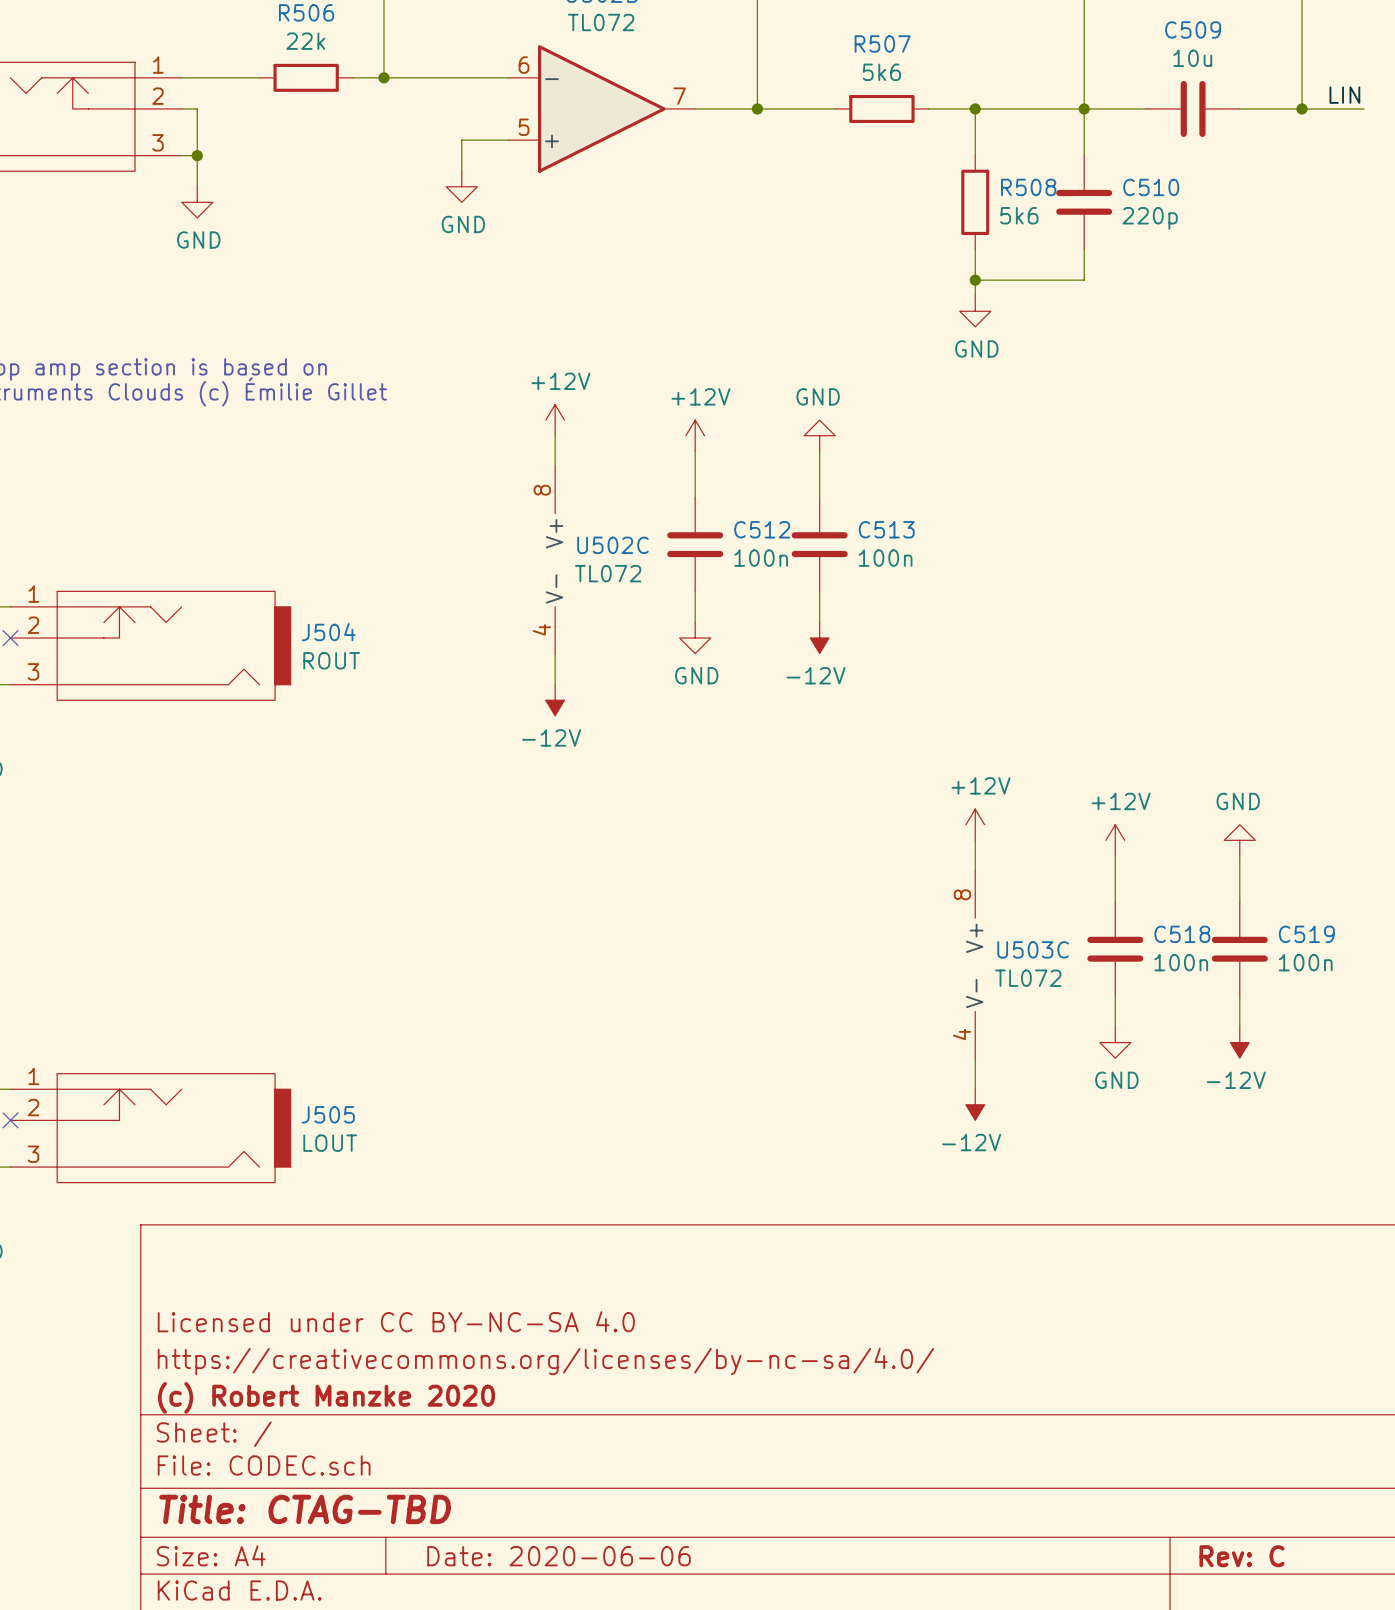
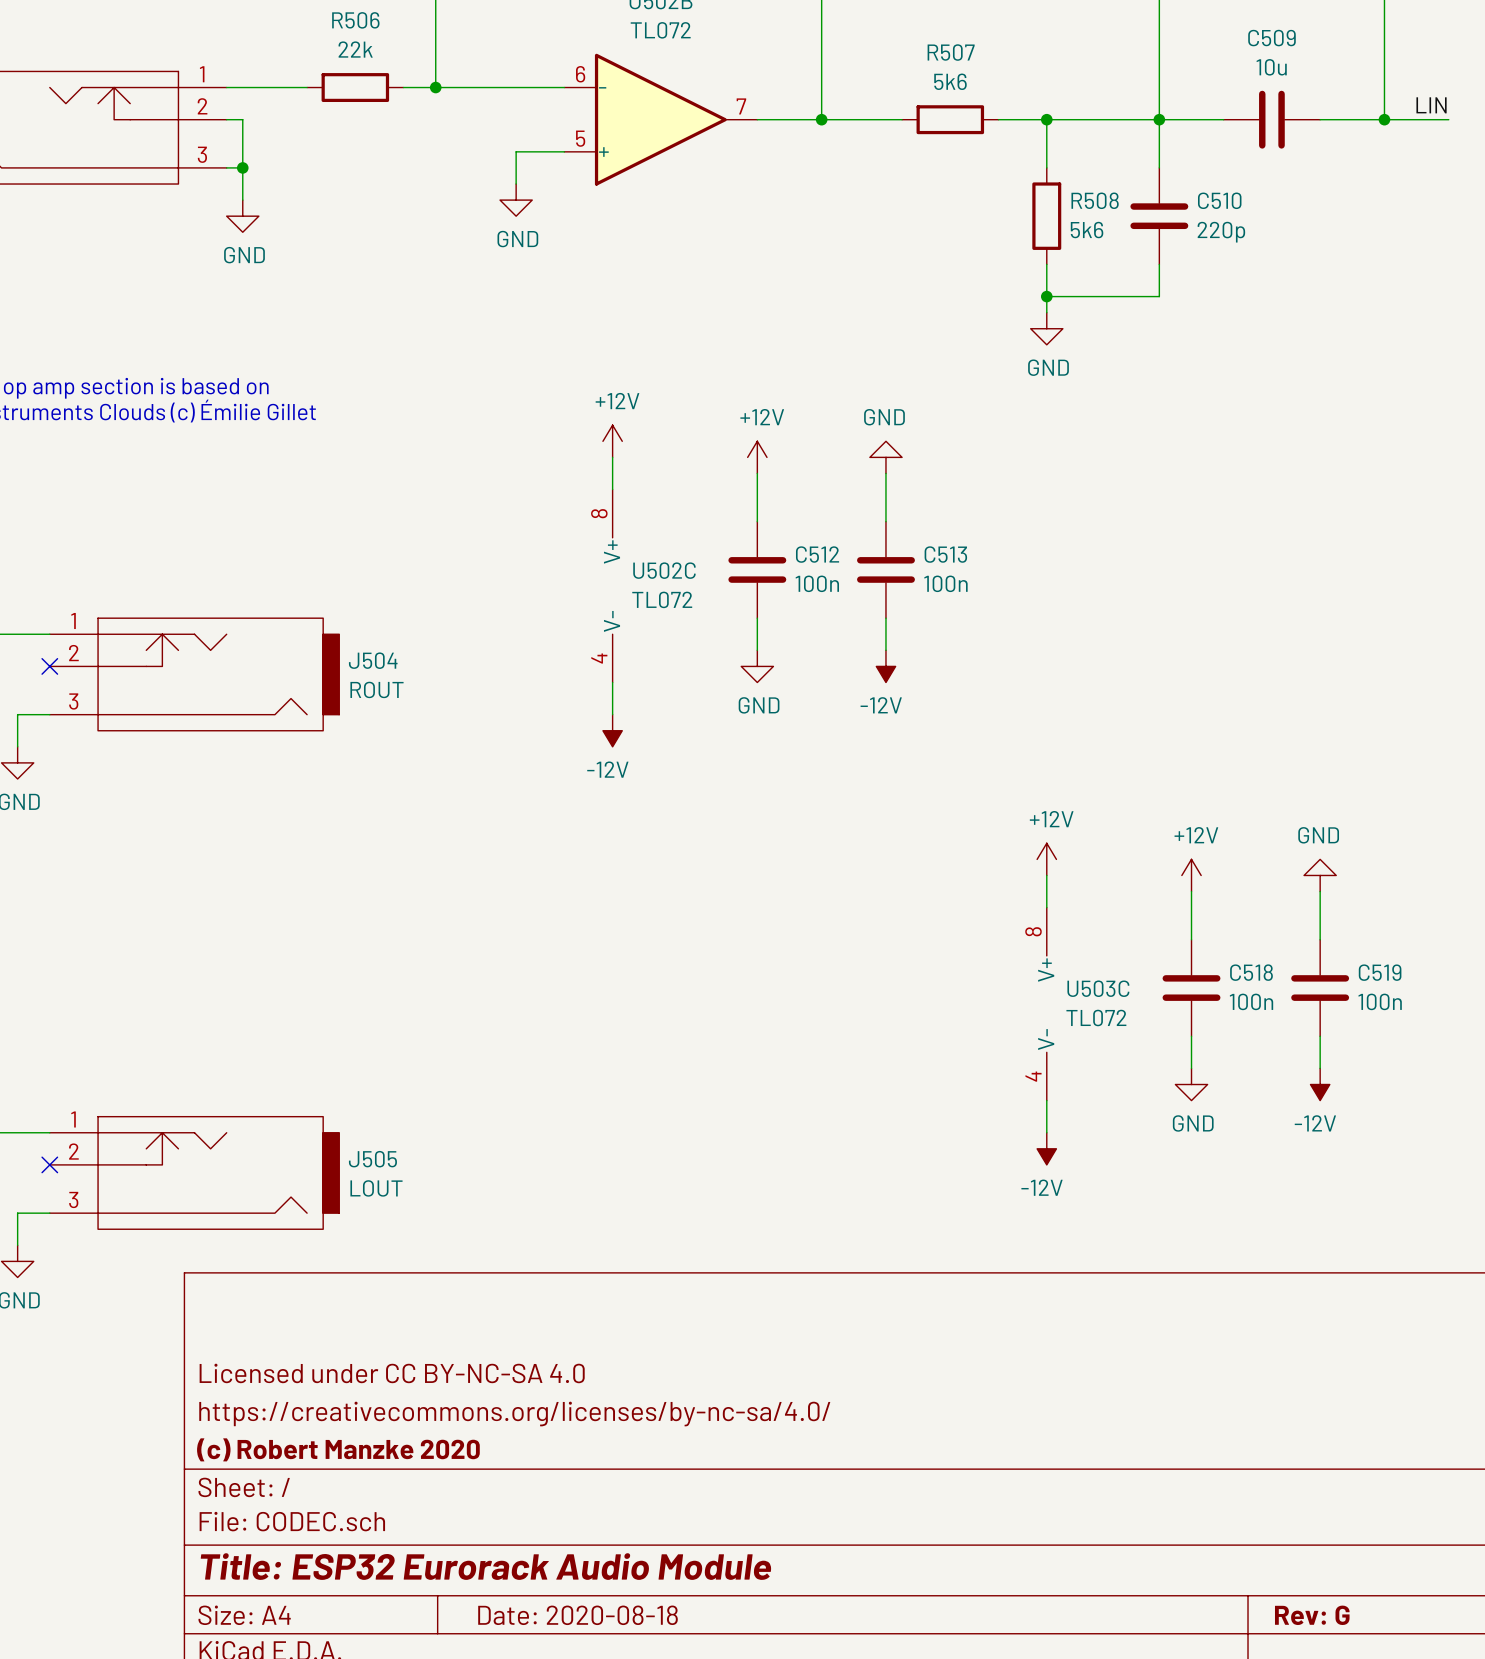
title block: Title: CTAG-TBD (305, 1509) -> Title: ESP32 Eurorack Audio Module (485, 1566)
title block: Date: 2020-06-06 (559, 1556) -> Date: 2020-08-18 (578, 1615)
title block: Rev: C (1241, 1556) -> Rev: G (1312, 1615)

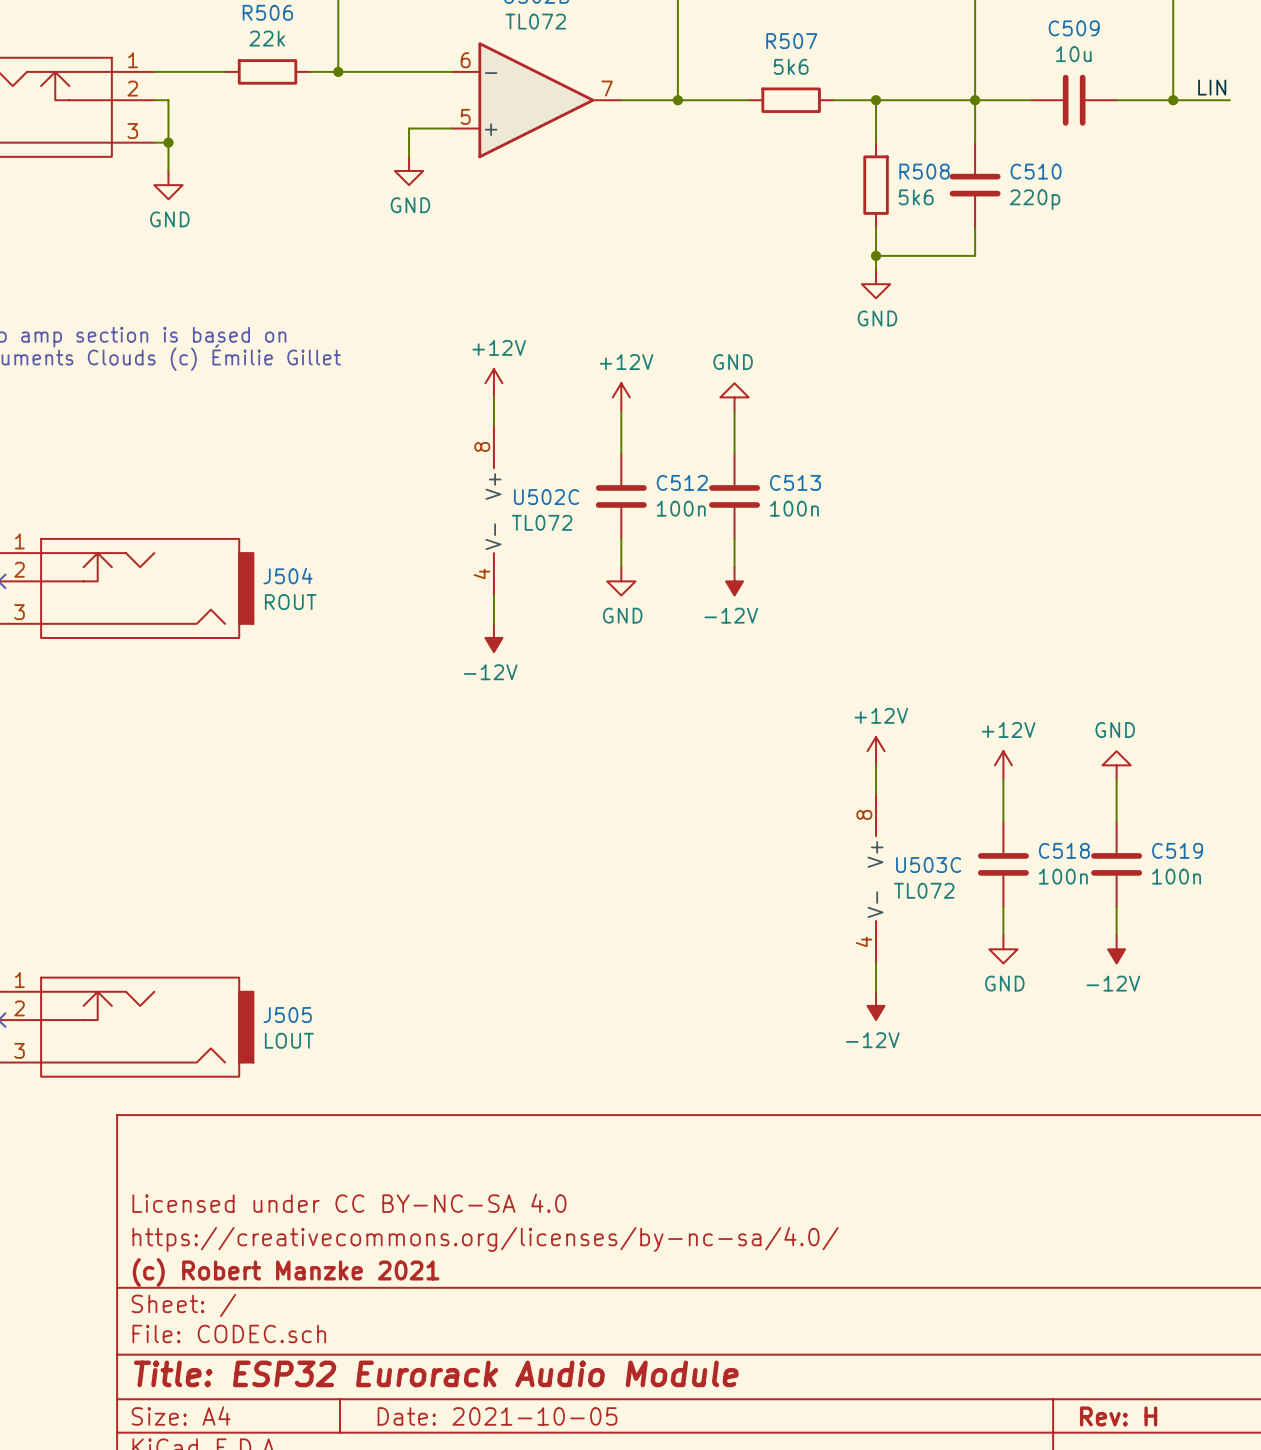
title block: (c) Robert Manzke 2020 (338, 1449) -> (c) Robert Manzke 2021 (286, 1272)
title block: Date: 2020-08-18 (578, 1615) -> Date: 2021-10-05 (497, 1416)
title block: Rev: G (1312, 1615) -> Rev: H (1118, 1416)

